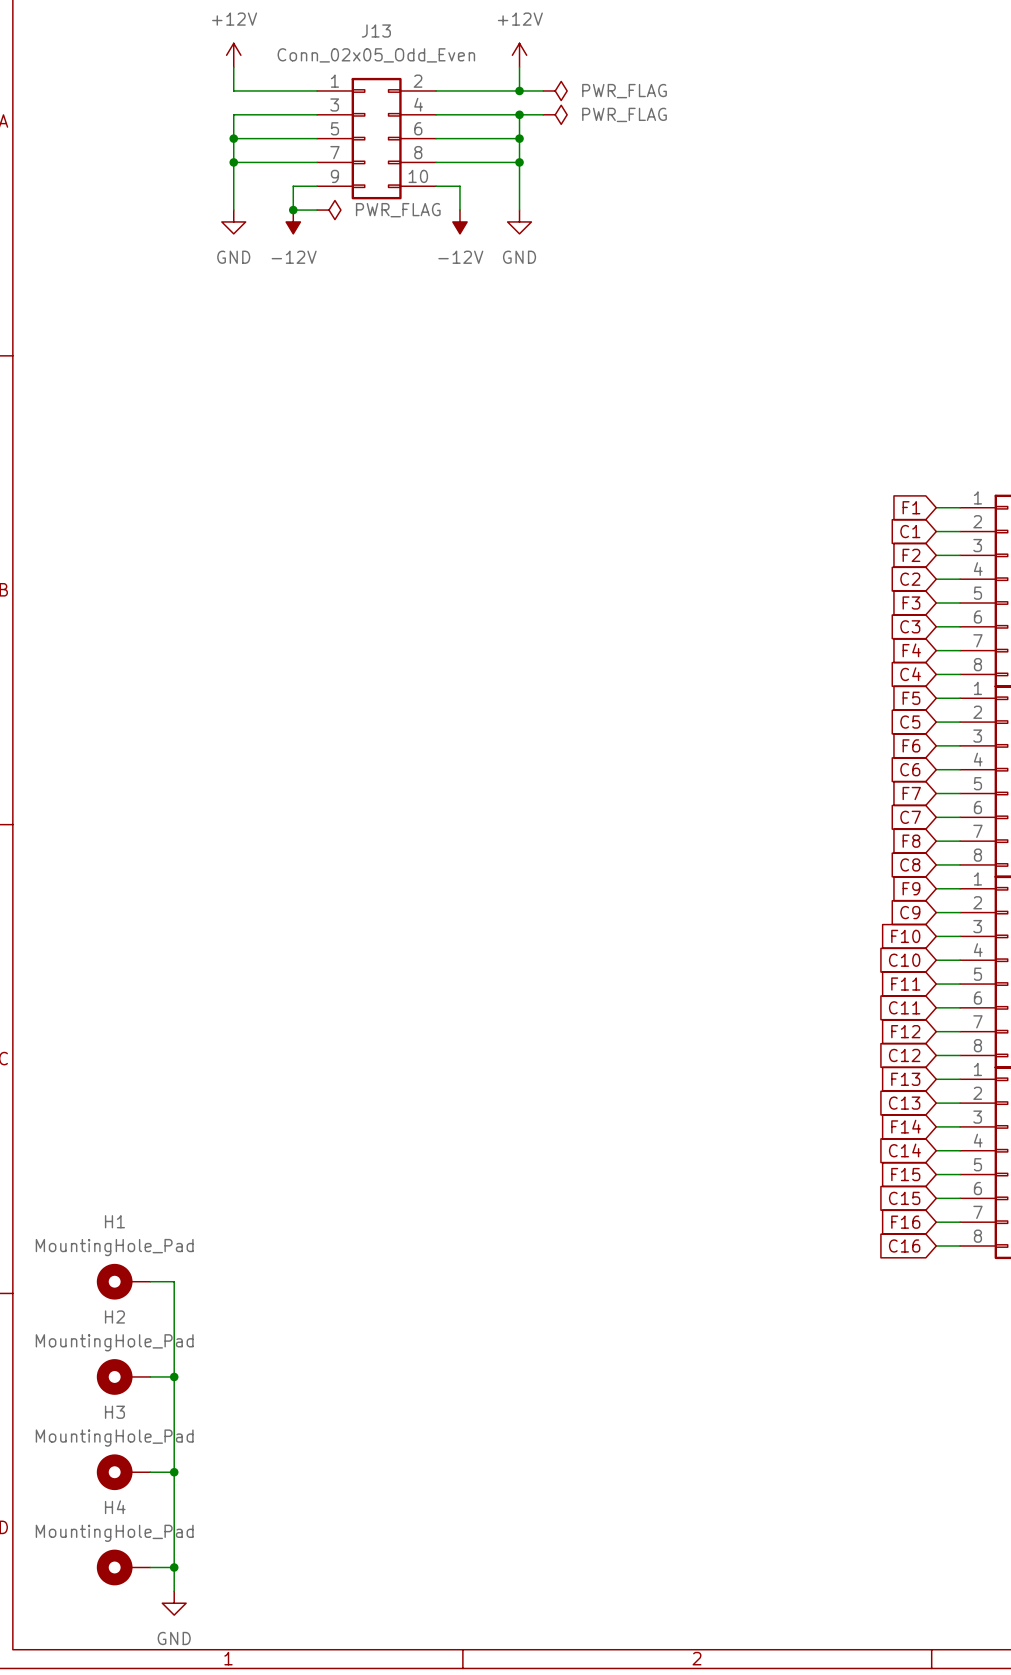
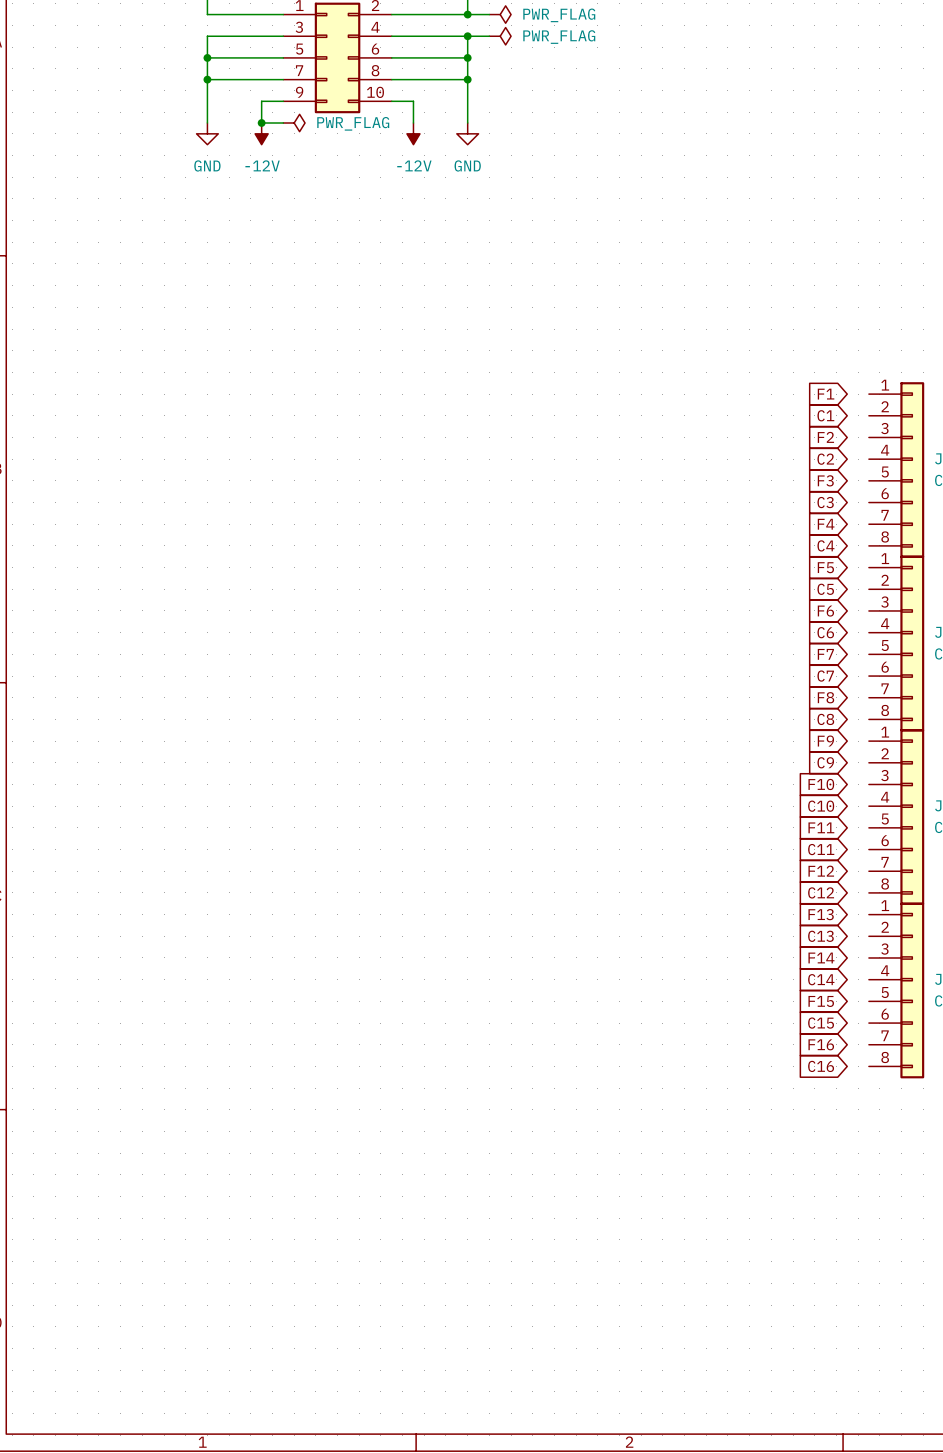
wire: (936, 507) (960, 507) -> none
wire: (936, 531) (960, 531) -> none
wire: (936, 555) (960, 555) -> none
wire: (936, 579) (960, 579) -> none
wire: (936, 603) (960, 603) -> none
wire: (936, 626) (960, 626) -> none
wire: (936, 650) (960, 650) -> none
wire: (936, 674) (960, 674) -> none
wire: (936, 698) (960, 698) -> none
wire: (936, 722) (960, 722) -> none
wire: (936, 745) (960, 745) -> none
wire: (936, 769) (960, 769) -> none
wire: (936, 793) (960, 793) -> none
wire: (936, 817) (960, 817) -> none
wire: (936, 841) (960, 841) -> none
wire: (936, 864) (960, 864) -> none
wire: (936, 888) (960, 888) -> none
wire: (936, 912) (960, 912) -> none
wire: (936, 936) (960, 936) -> none
wire: (936, 960) (960, 960) -> none
wire: (936, 984) (960, 984) -> none
wire: (936, 1007) (960, 1007) -> none
wire: (936, 1031) (960, 1031) -> none
wire: (936, 1055) (960, 1055) -> none
wire: (936, 1079) (960, 1079) -> none
wire: (936, 1103) (960, 1103) -> none
wire: (936, 1126) (960, 1126) -> none
wire: (936, 1150) (960, 1150) -> none
wire: (936, 1174) (960, 1174) -> none
wire: (936, 1198) (960, 1198) -> none
wire: (936, 1222) (960, 1222) -> none
wire: (936, 1245) (960, 1245) -> none
H1: MountingHole_Pad (123, 1281) -> none
wire: (150, 1281) (174, 1281) (174, 1591) -> none
H2: MountingHole_Pad (123, 1376) -> none
wire: (150, 1376) (174, 1376) -> none
junction: (174, 1376) -> none
H3: MountingHole_Pad (123, 1472) -> none
wire: (150, 1472) (174, 1472) -> none
junction: (174, 1472) -> none
H4: MountingHole_Pad (123, 1567) -> none
wire: (150, 1567) (174, 1567) -> none
junction: (174, 1567) -> none
power symbol: GND (174, 1603) -> none

